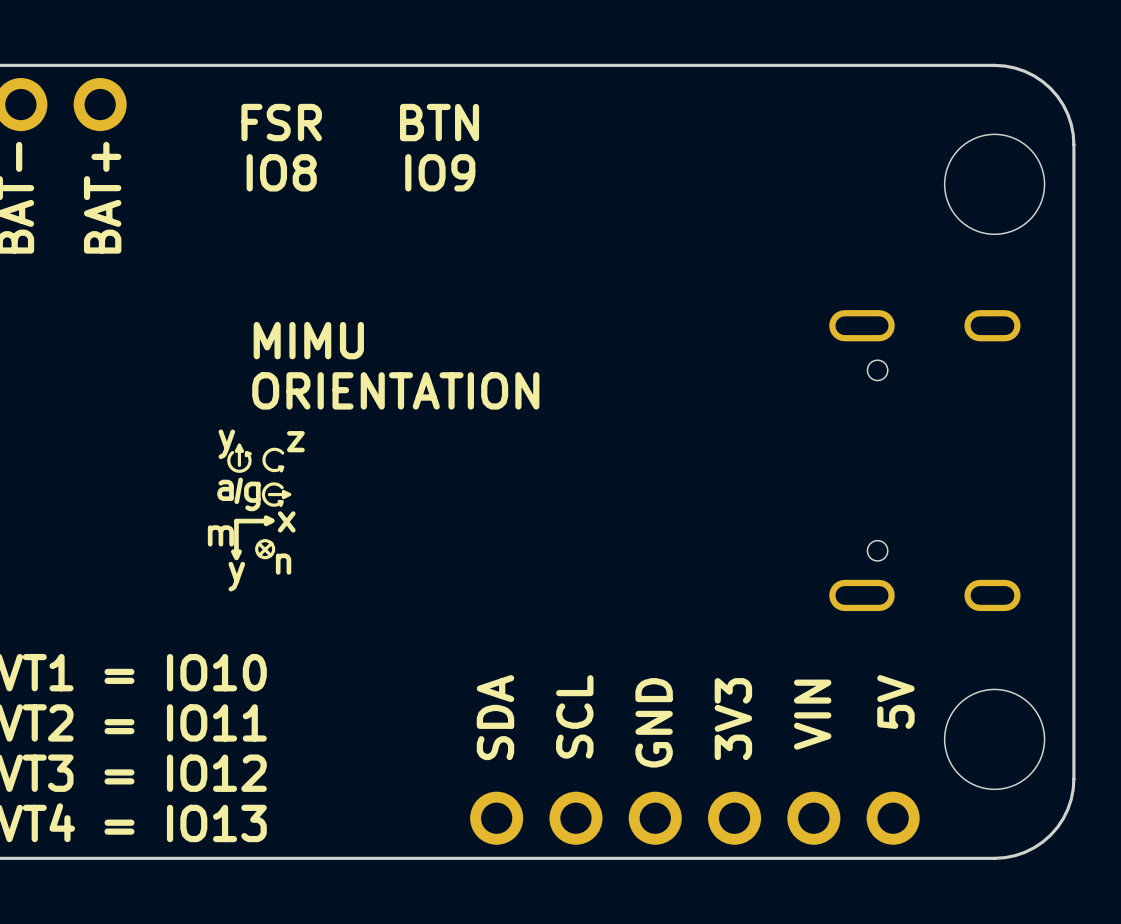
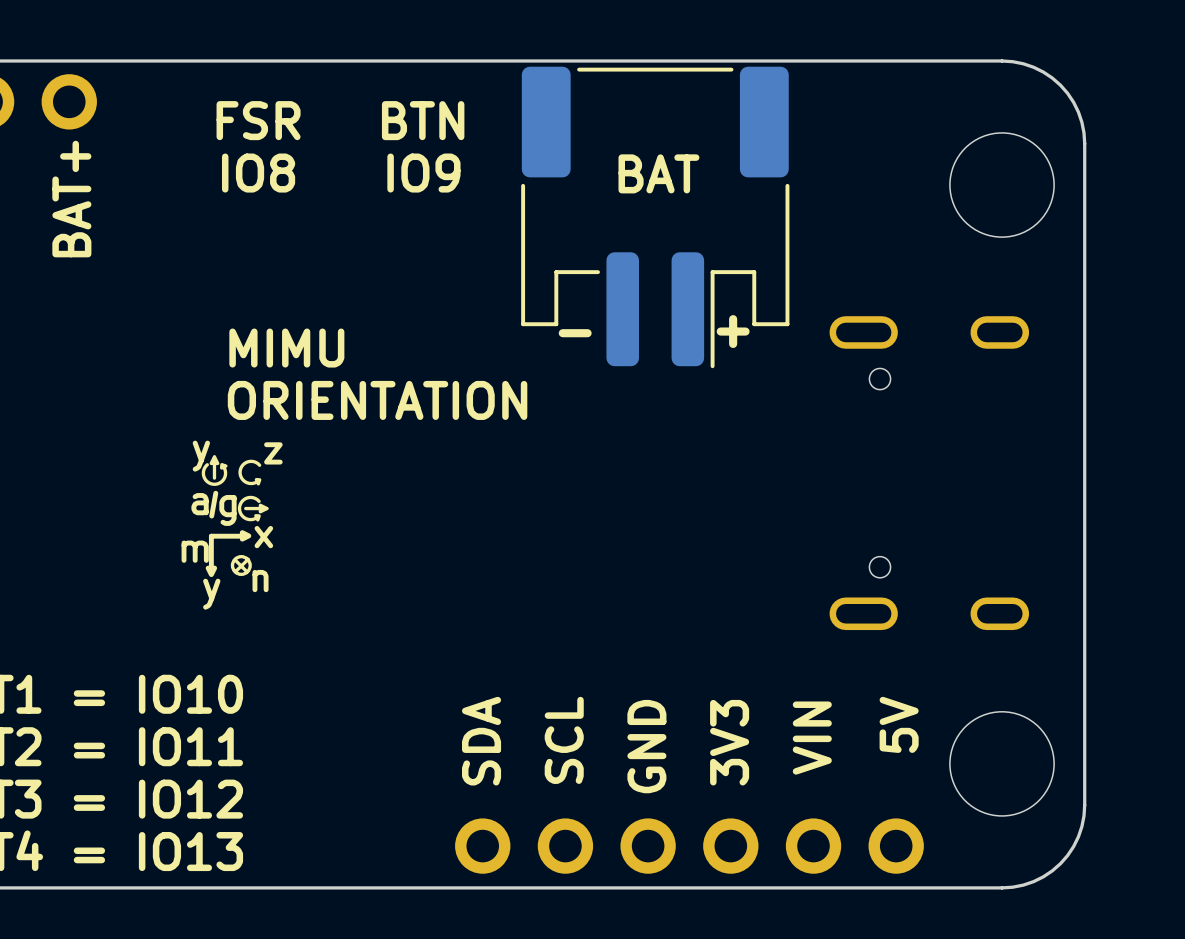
text: none -> BAT (658, 173)
part: none -> (655, 217)
text: none -> + (733, 331)
text: none -> - (575, 333)

